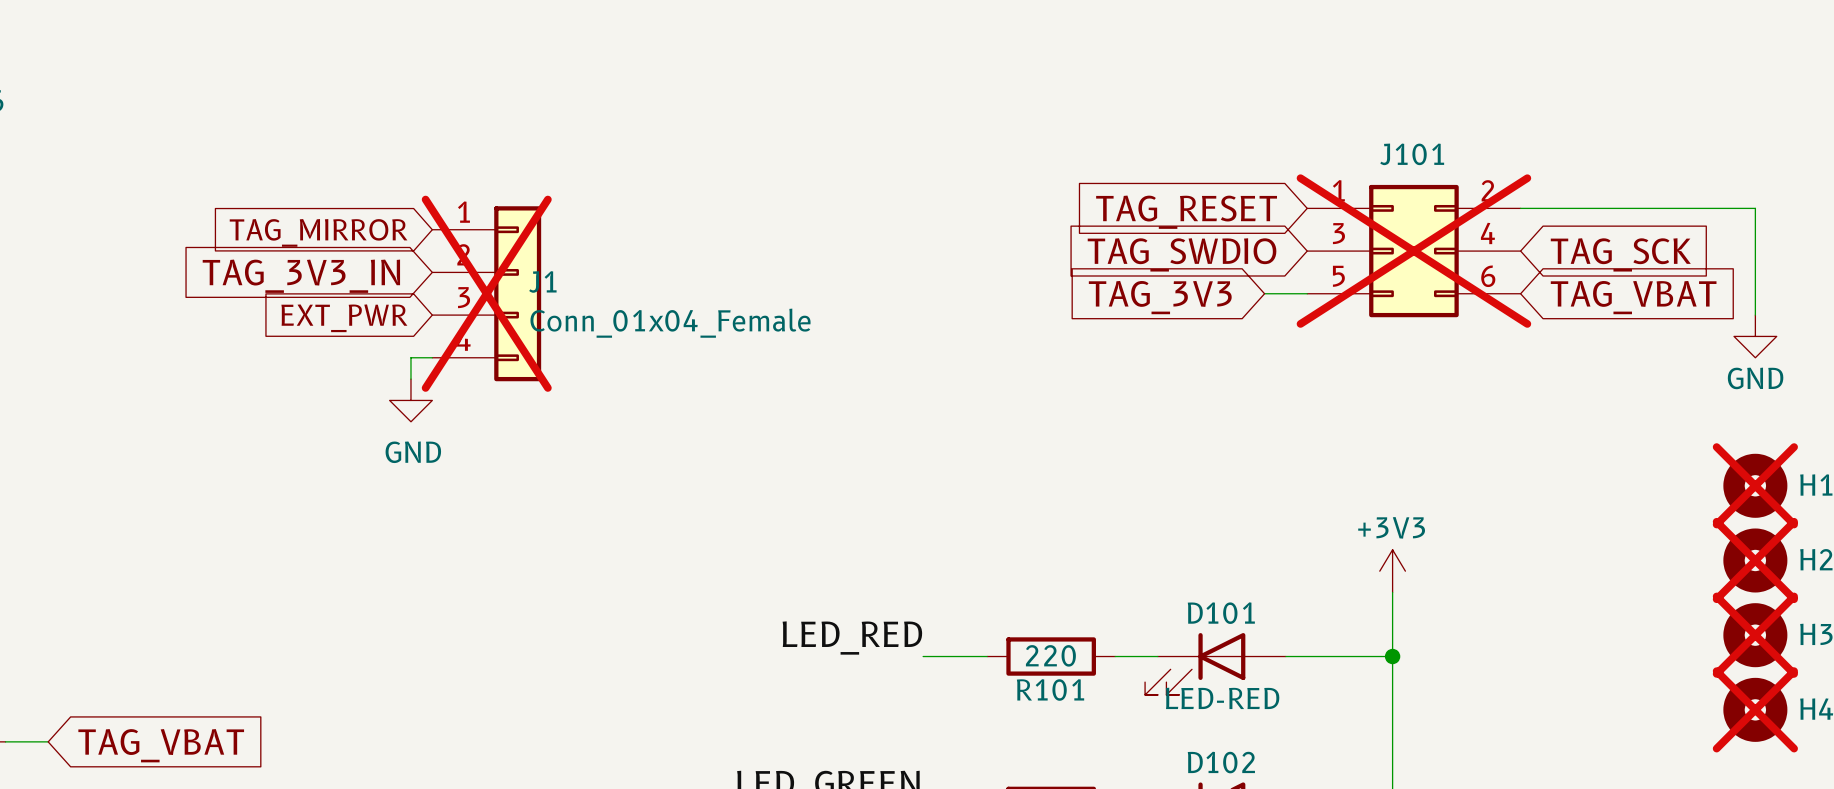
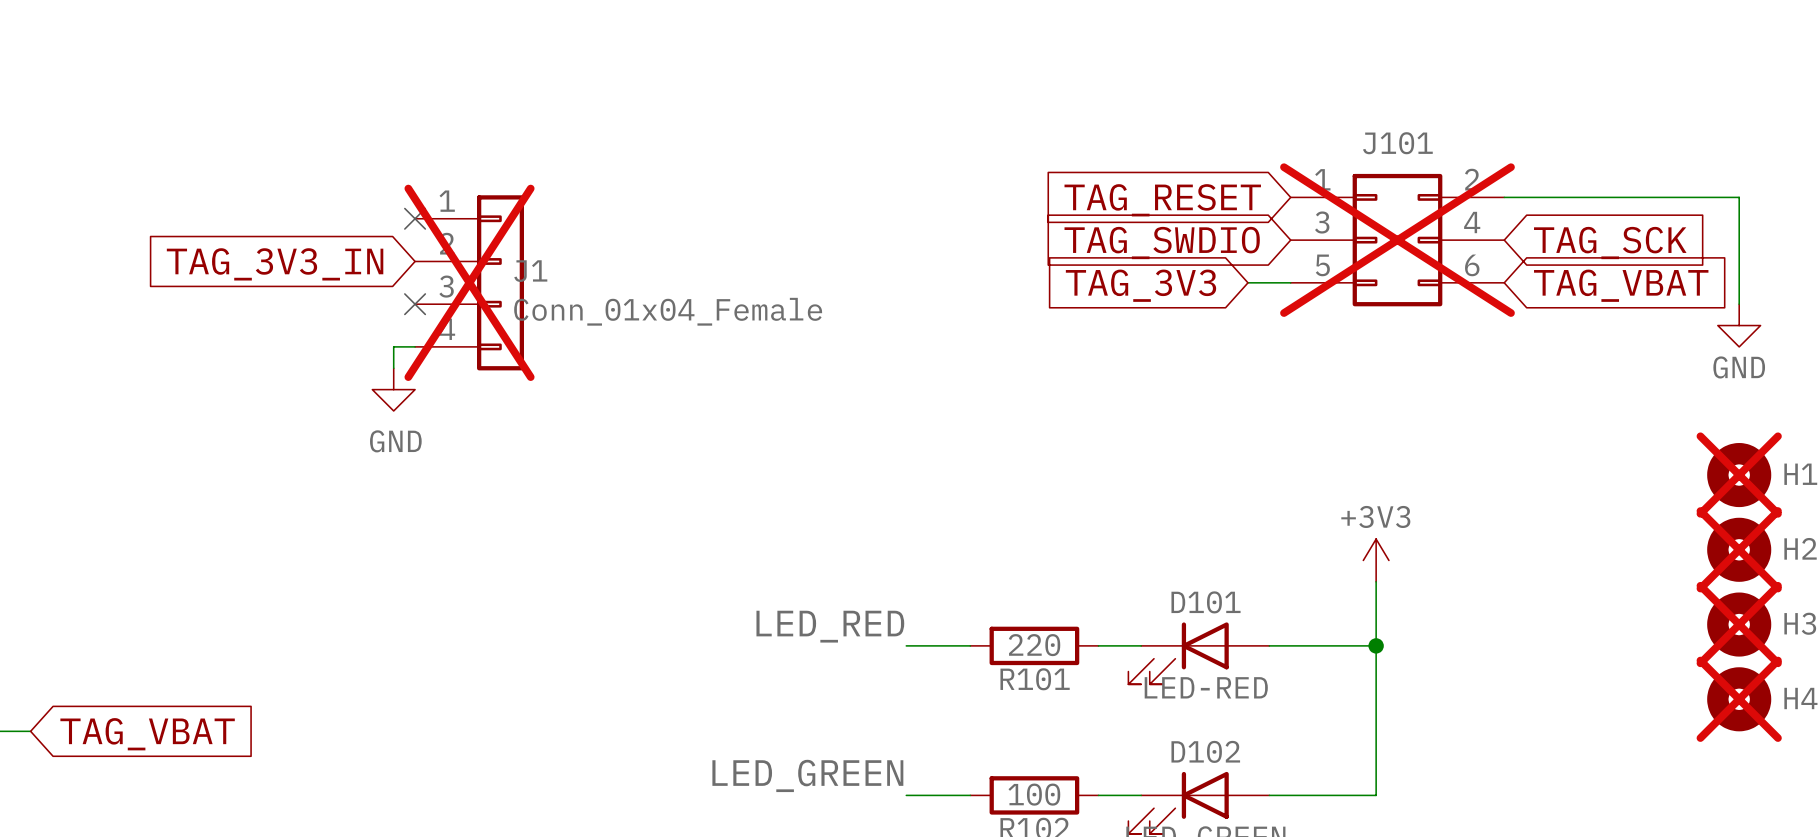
no-connect mark: none -> (415, 218)
global label: TAG_MIRROR (318, 232) -> none
no-connect mark: none -> (415, 304)
global label: EXT_PWR (344, 318) -> none

